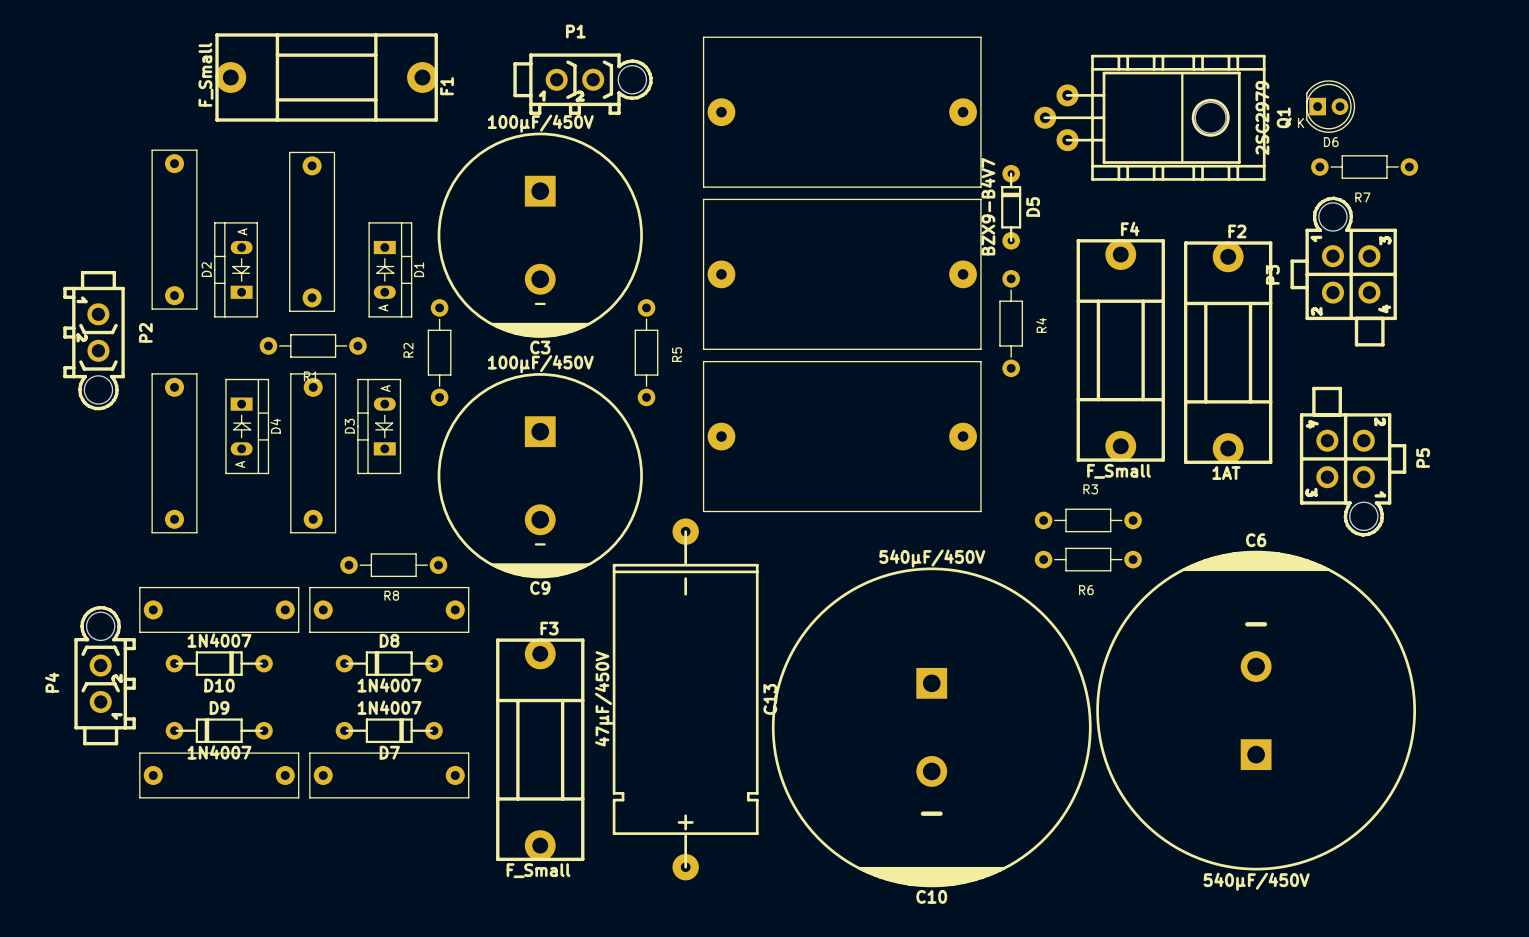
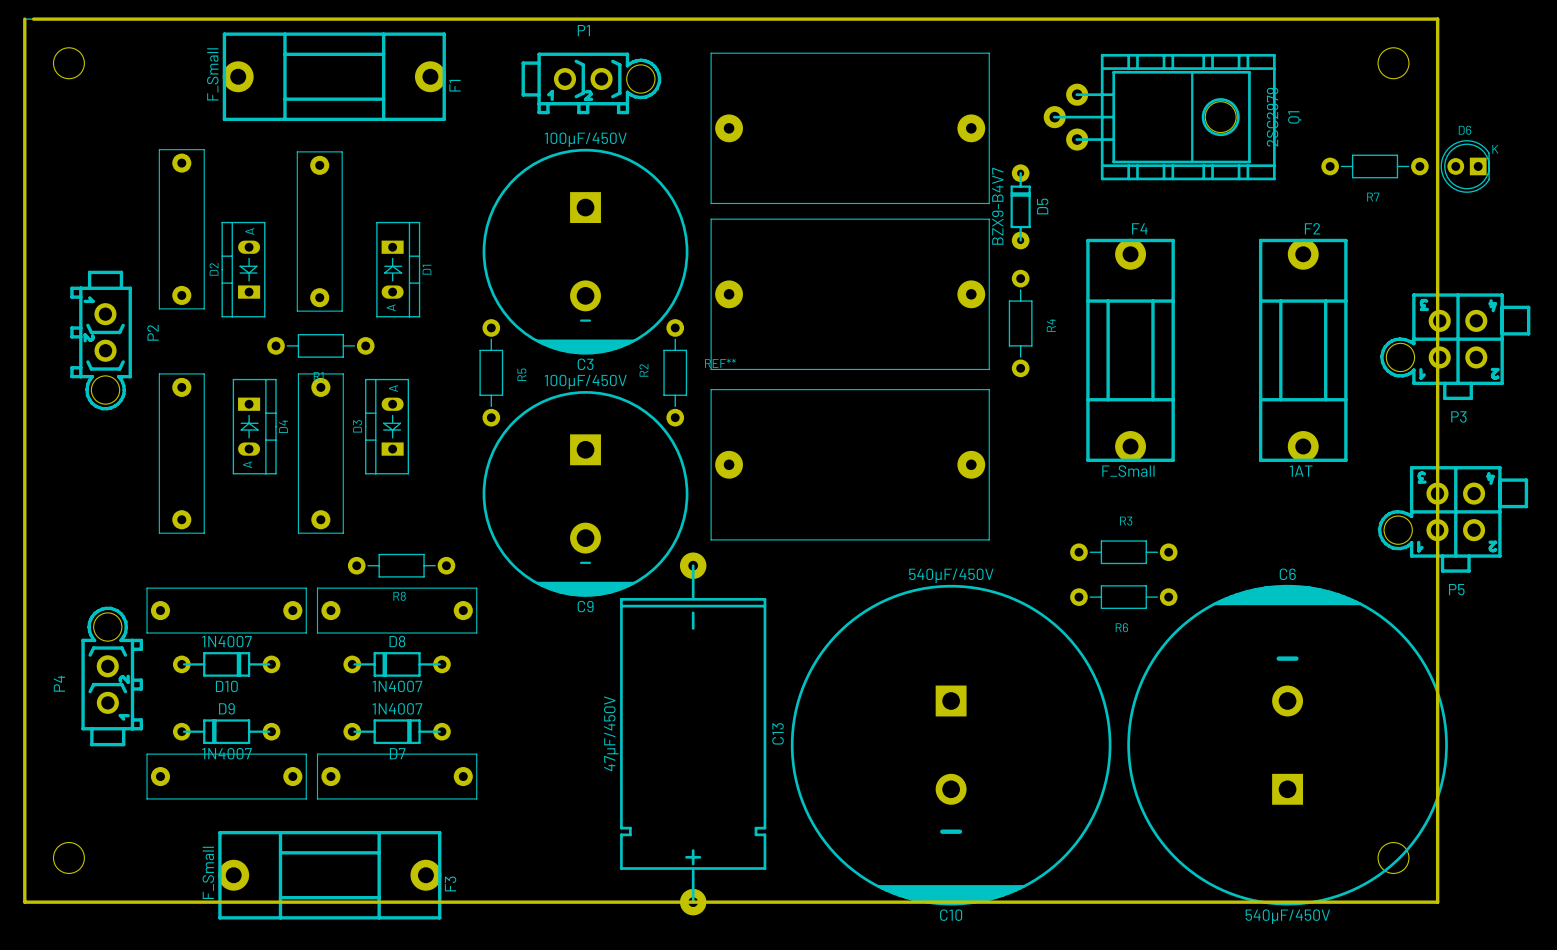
D6 rotation: 0° (1330, 106) -> 180° (1465, 166)
D6 position: (1330, 106) -> (1465, 166)
part position: (842, 112) -> (850, 128)
C3 position: (540, 235) -> (585, 251)
P3 rotation: 0° (1343, 271) -> 90° counterclockwise (1455, 346)
P3 position: (1343, 271) -> (1455, 346)
part position: (842, 274) -> (850, 294)
R2 position: (439, 352) -> (675, 372)
R5 position: (646, 352) -> (491, 372)
F2 position: (1228, 352) -> (1303, 350)
part position: (842, 436) -> (850, 464)
REF**: none -> (731, 460)
P5 rotation: 0° (1353, 461) -> 90° clockwise (1452, 519)
P5 position: (1353, 461) -> (1452, 519)
C9 position: (540, 475) -> (585, 493)
R3 position: (1088, 520) -> (1123, 552)
R6 position: (1088, 559) -> (1123, 597)
C13 position: (685, 699) -> (693, 733)
C6 position: (1256, 710) -> (1287, 745)
C10 position: (931, 727) -> (951, 745)
F3 rotation: 0° (540, 749) -> 90° clockwise (329, 875)
F3 position: (540, 749) -> (329, 875)

